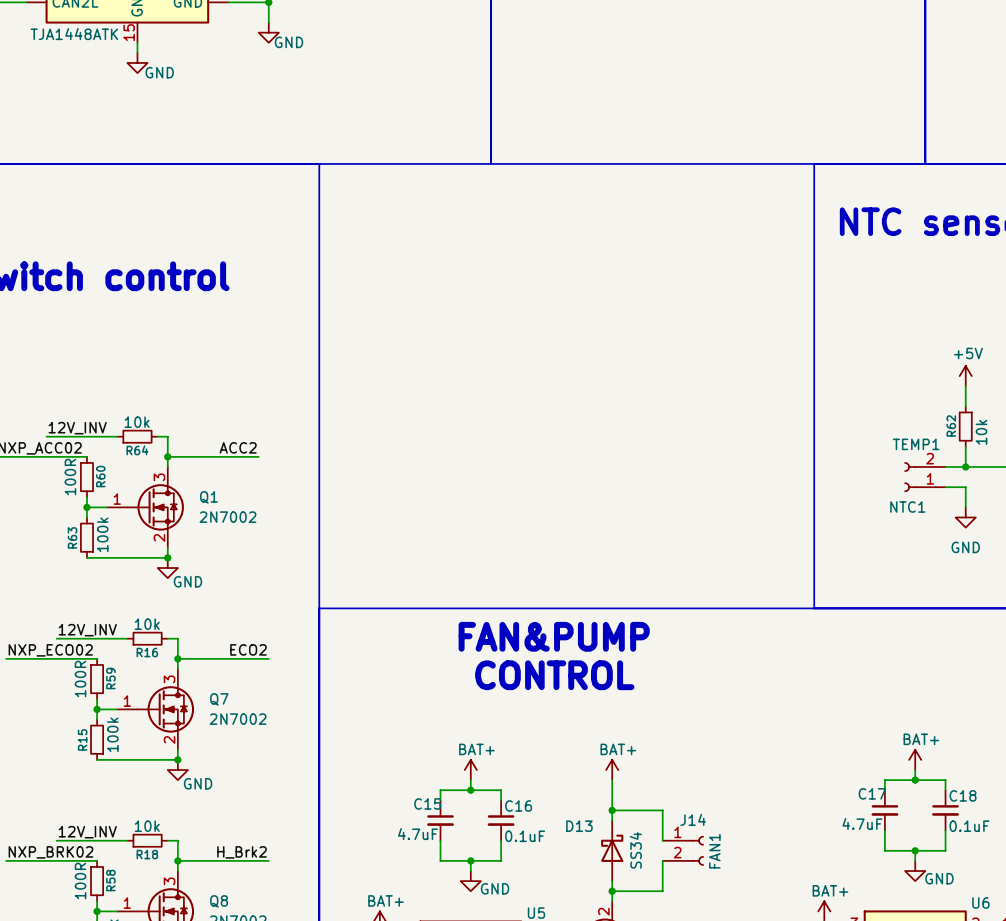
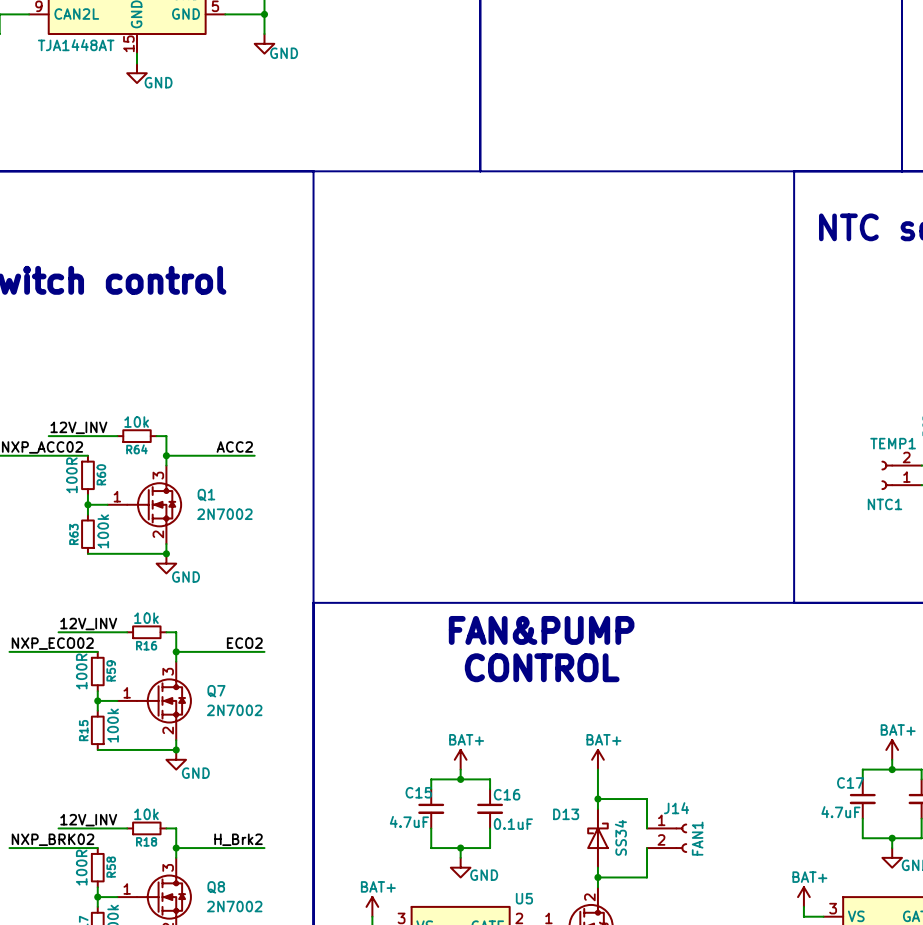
part value: TJA1448ATK (74, 34) -> TJA1448AT (76, 45)

